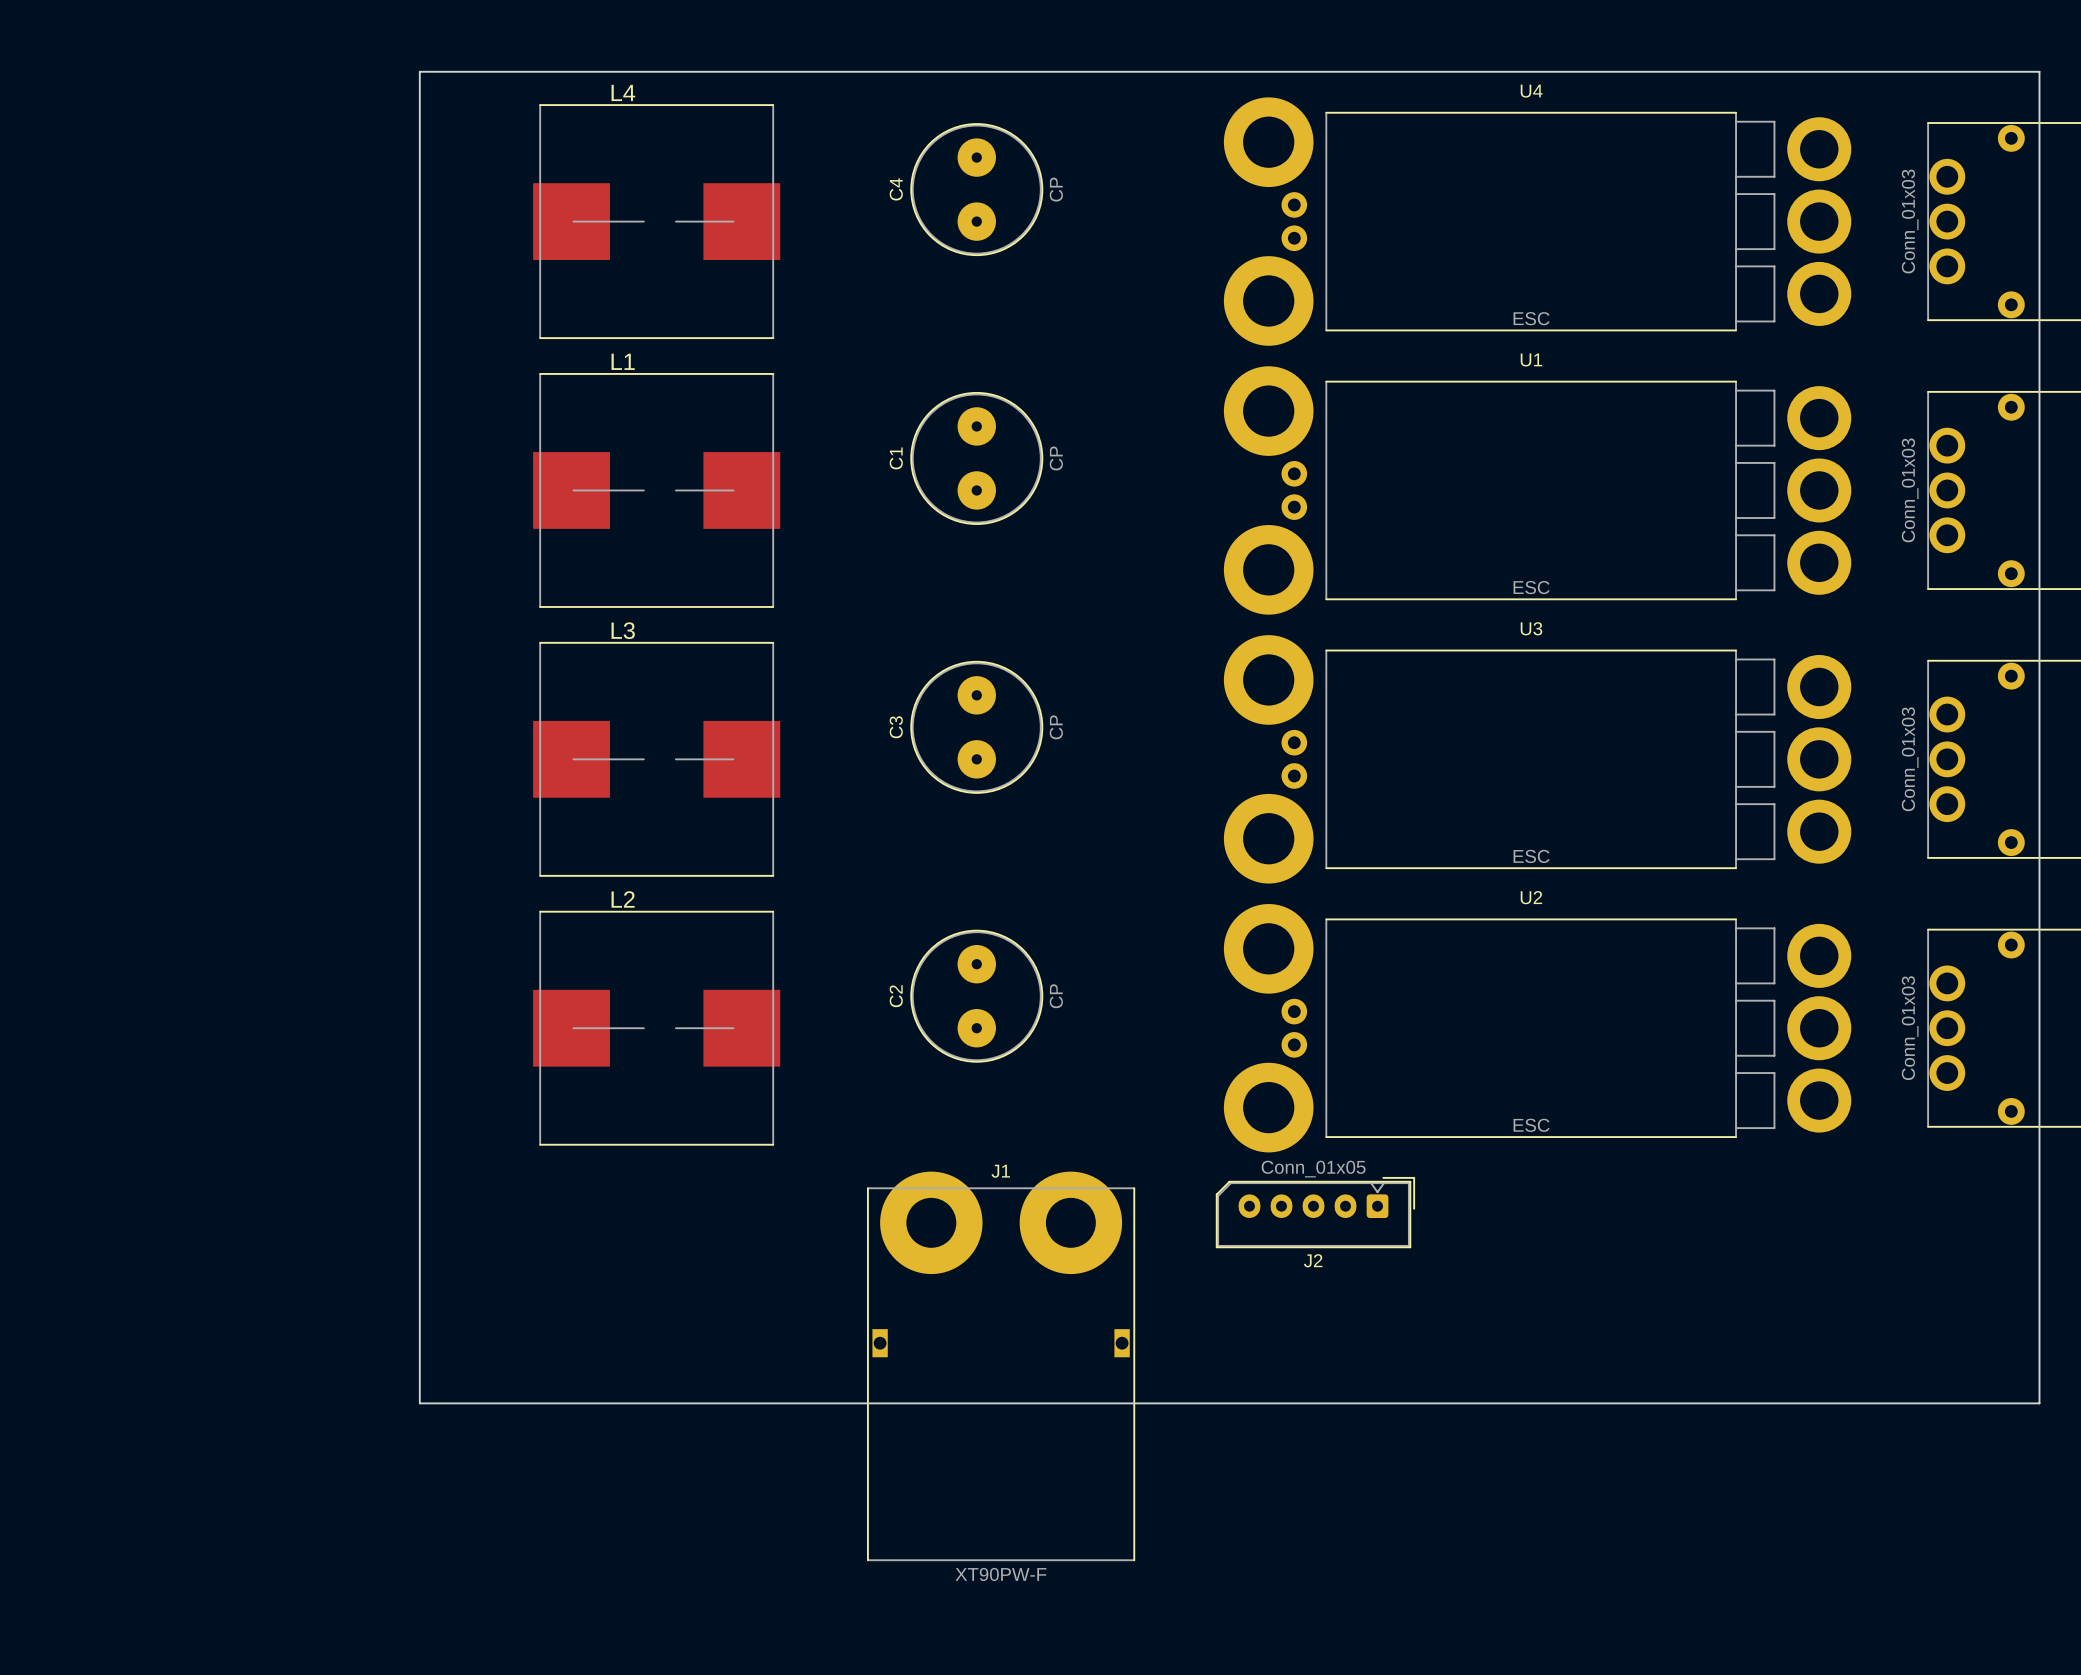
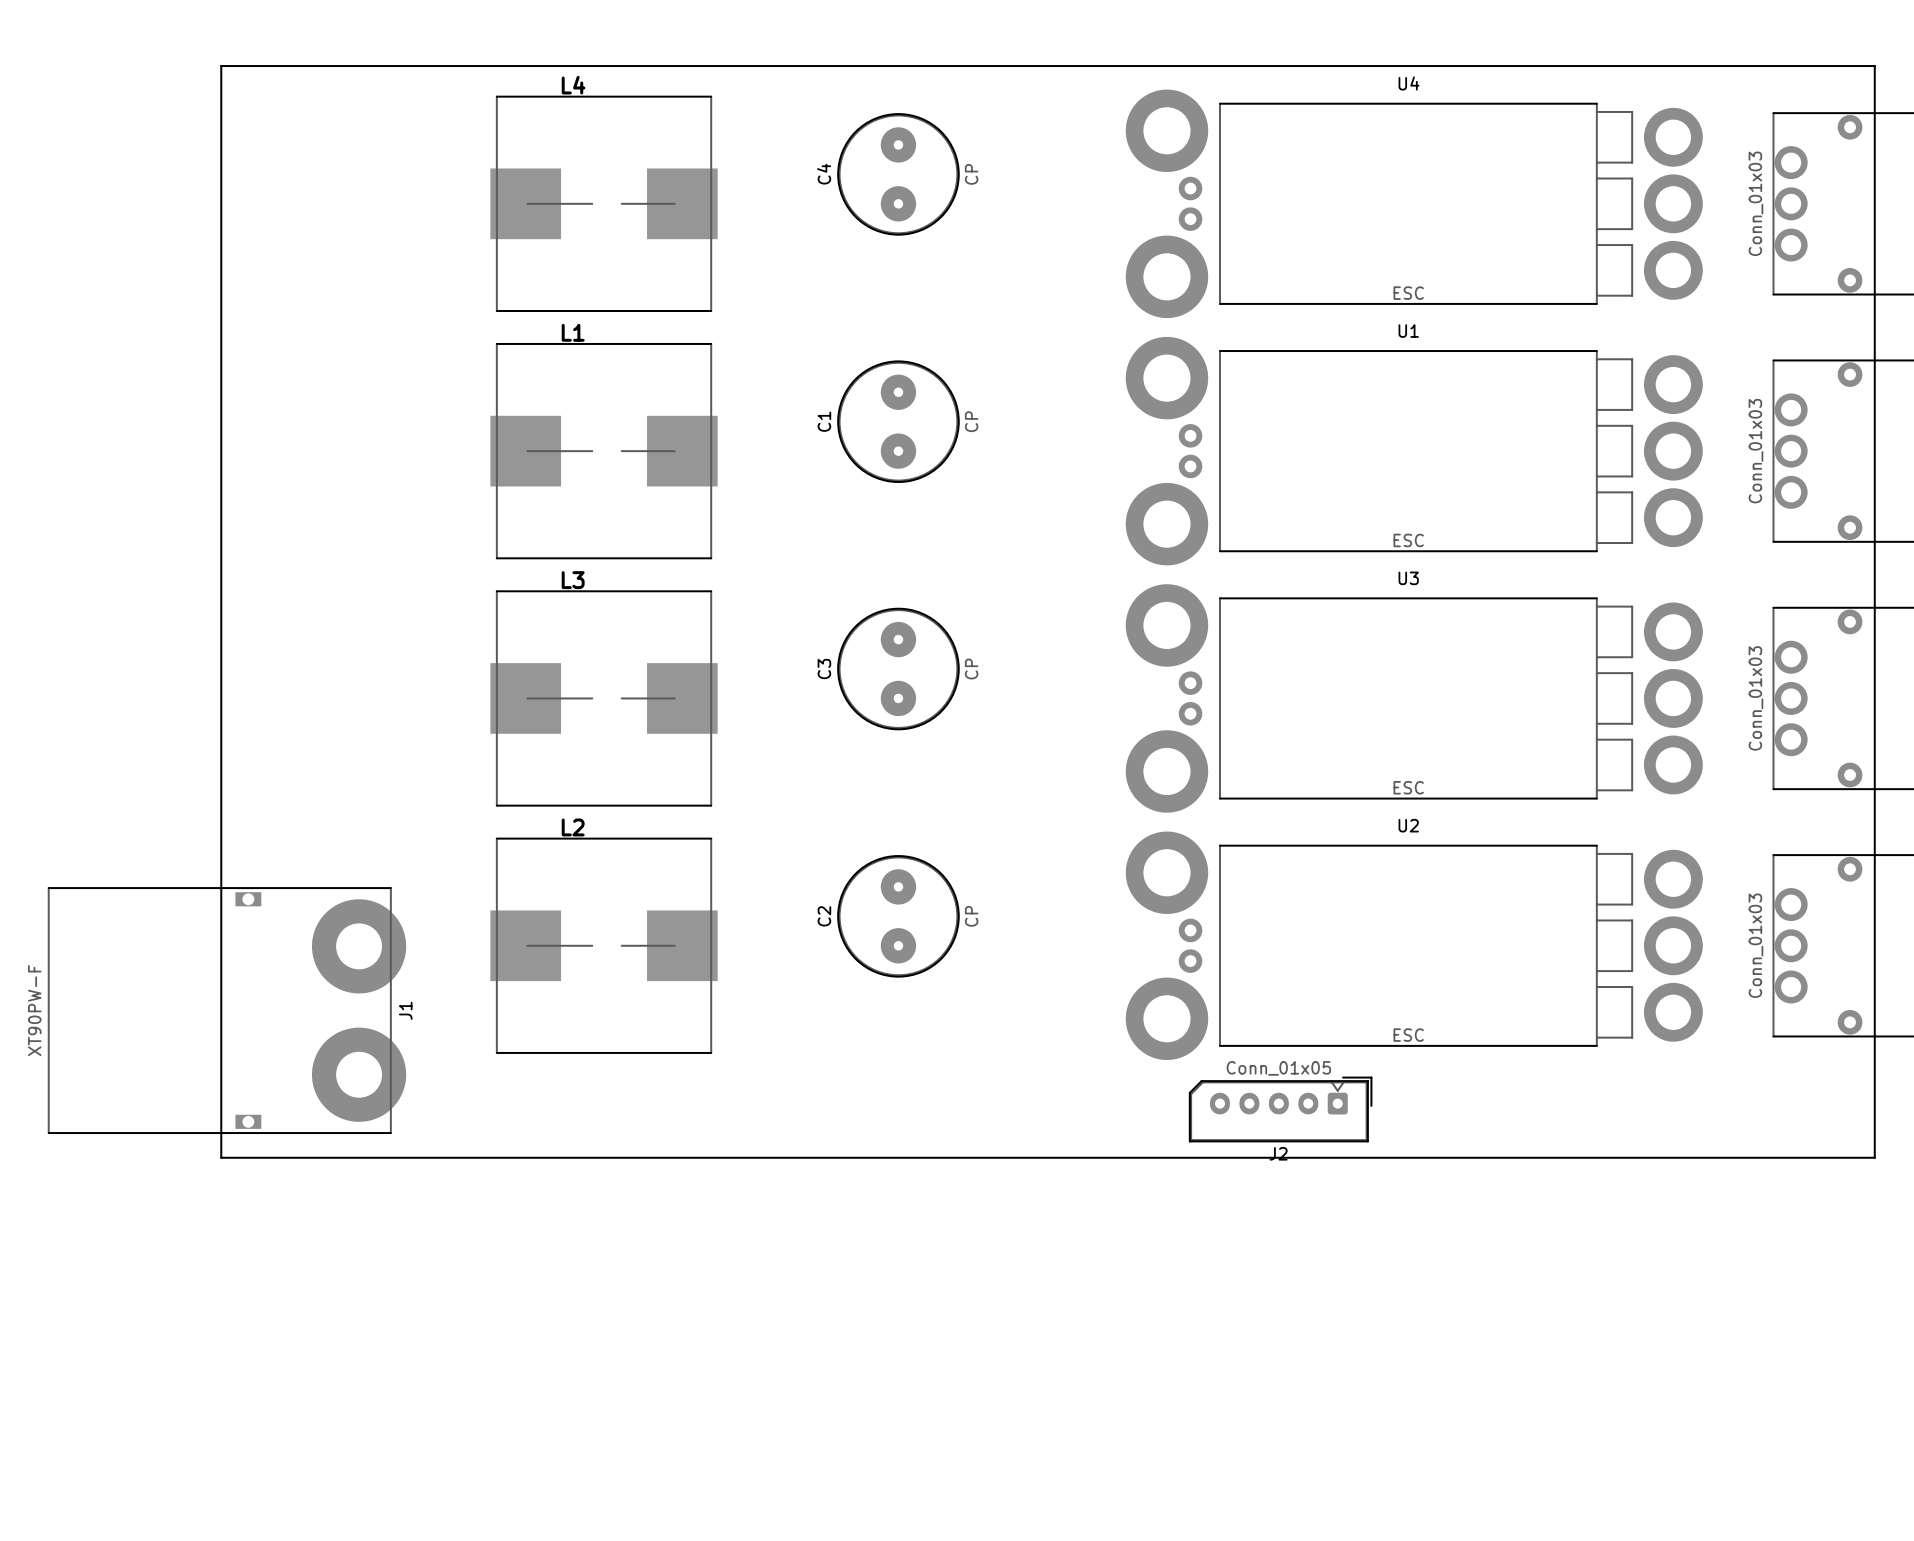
board edge: (419, 71) (419, 1403) (2039, 1403) (2038, 71) -> (386, 66) (221, 66) (221, 1157) (1874, 1157) (1874, 66)
J2 position: (1315, 1212) -> (1280, 1109)
J1 rotation: 0° (1001, 1366) -> 90° clockwise (227, 1010)
J1 position: (1001, 1366) -> (227, 1010)

